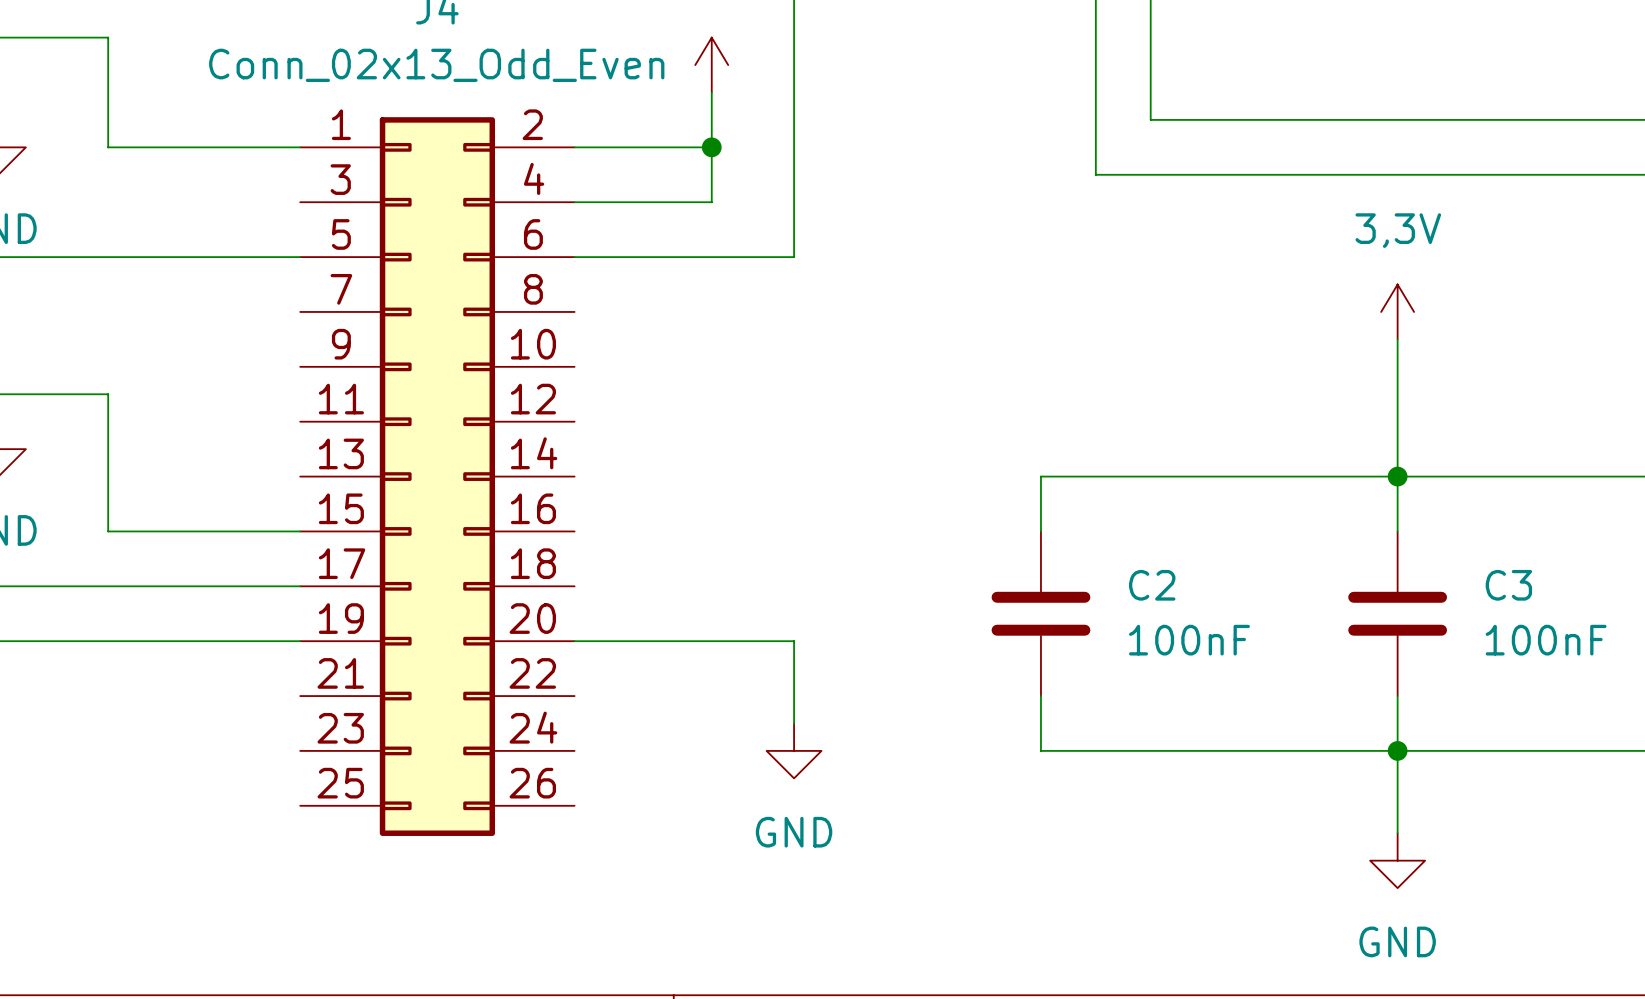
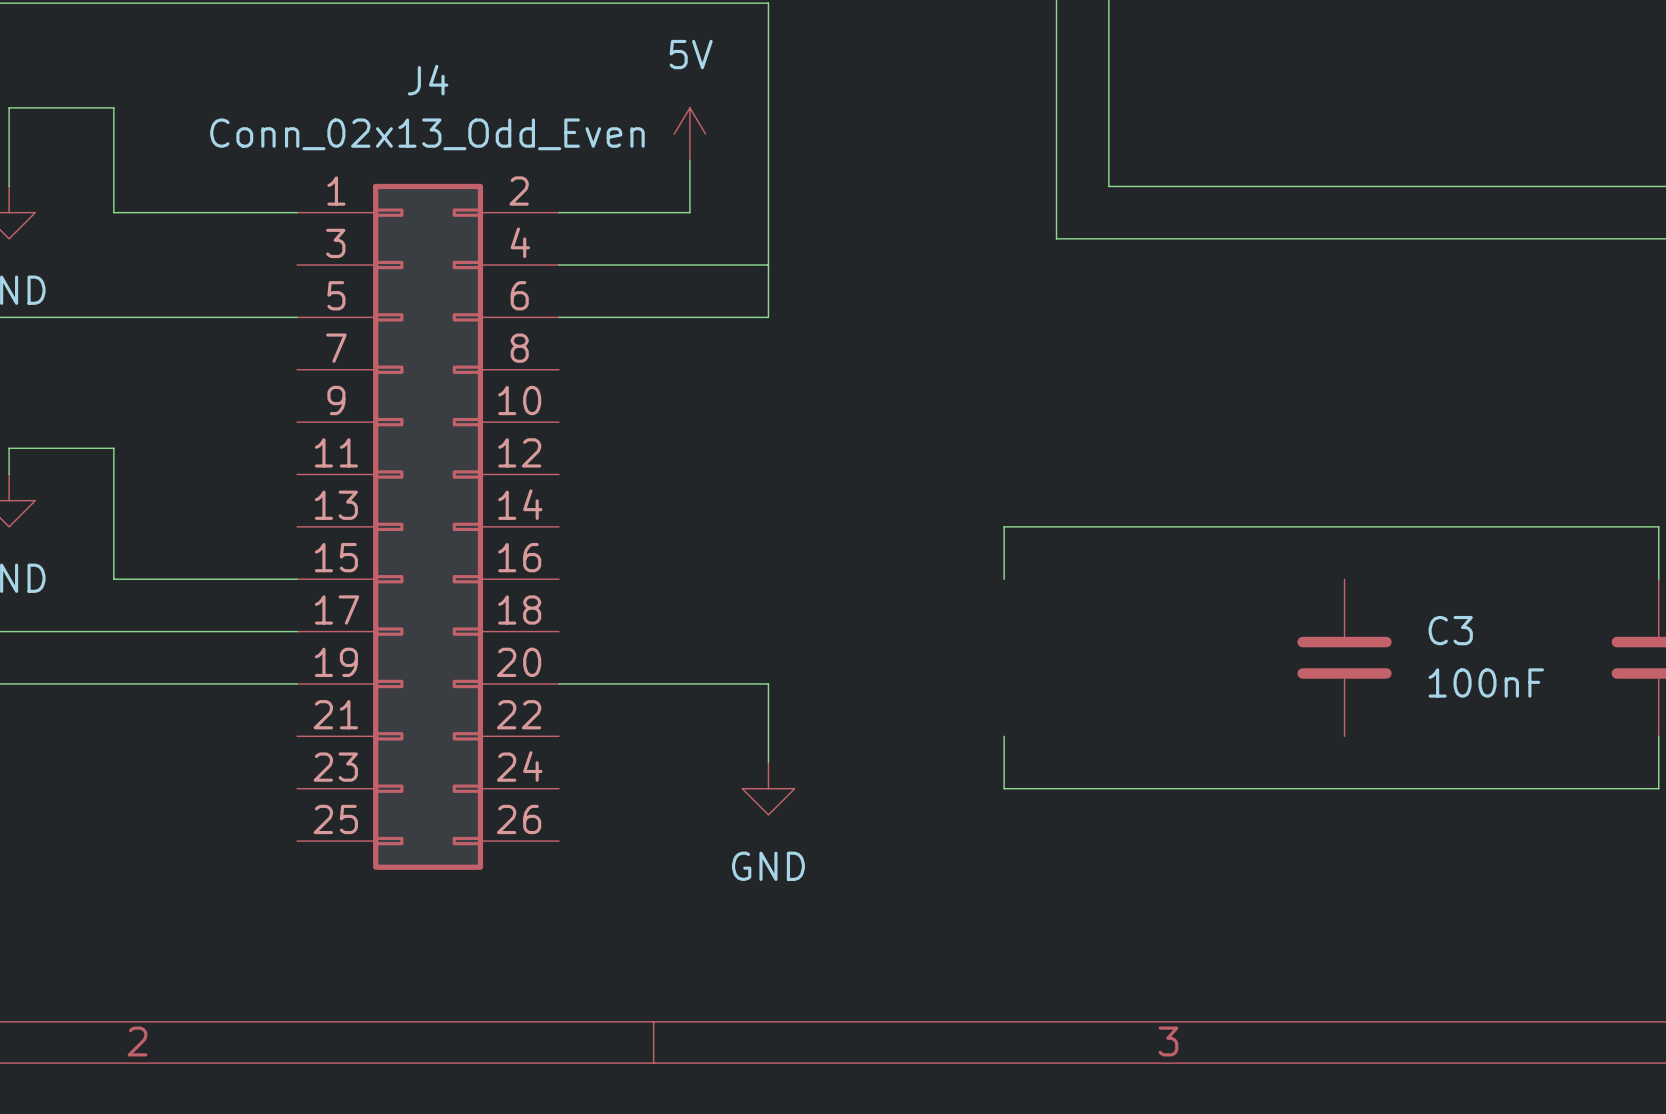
wire: (711, 147) (711, 202) -> (768, 265) (689, 265)
junction: (711, 147) -> none
power symbol: 3,3V (1397, 311) -> none
wire: (1397, 339) (1397, 531) -> none
junction: (1397, 476) -> none
C2: 100nF (1040, 613) -> none
wire: (1397, 696) (1397, 833) -> none
junction: (1397, 750) -> none
power symbol: GND (1397, 860) -> none

